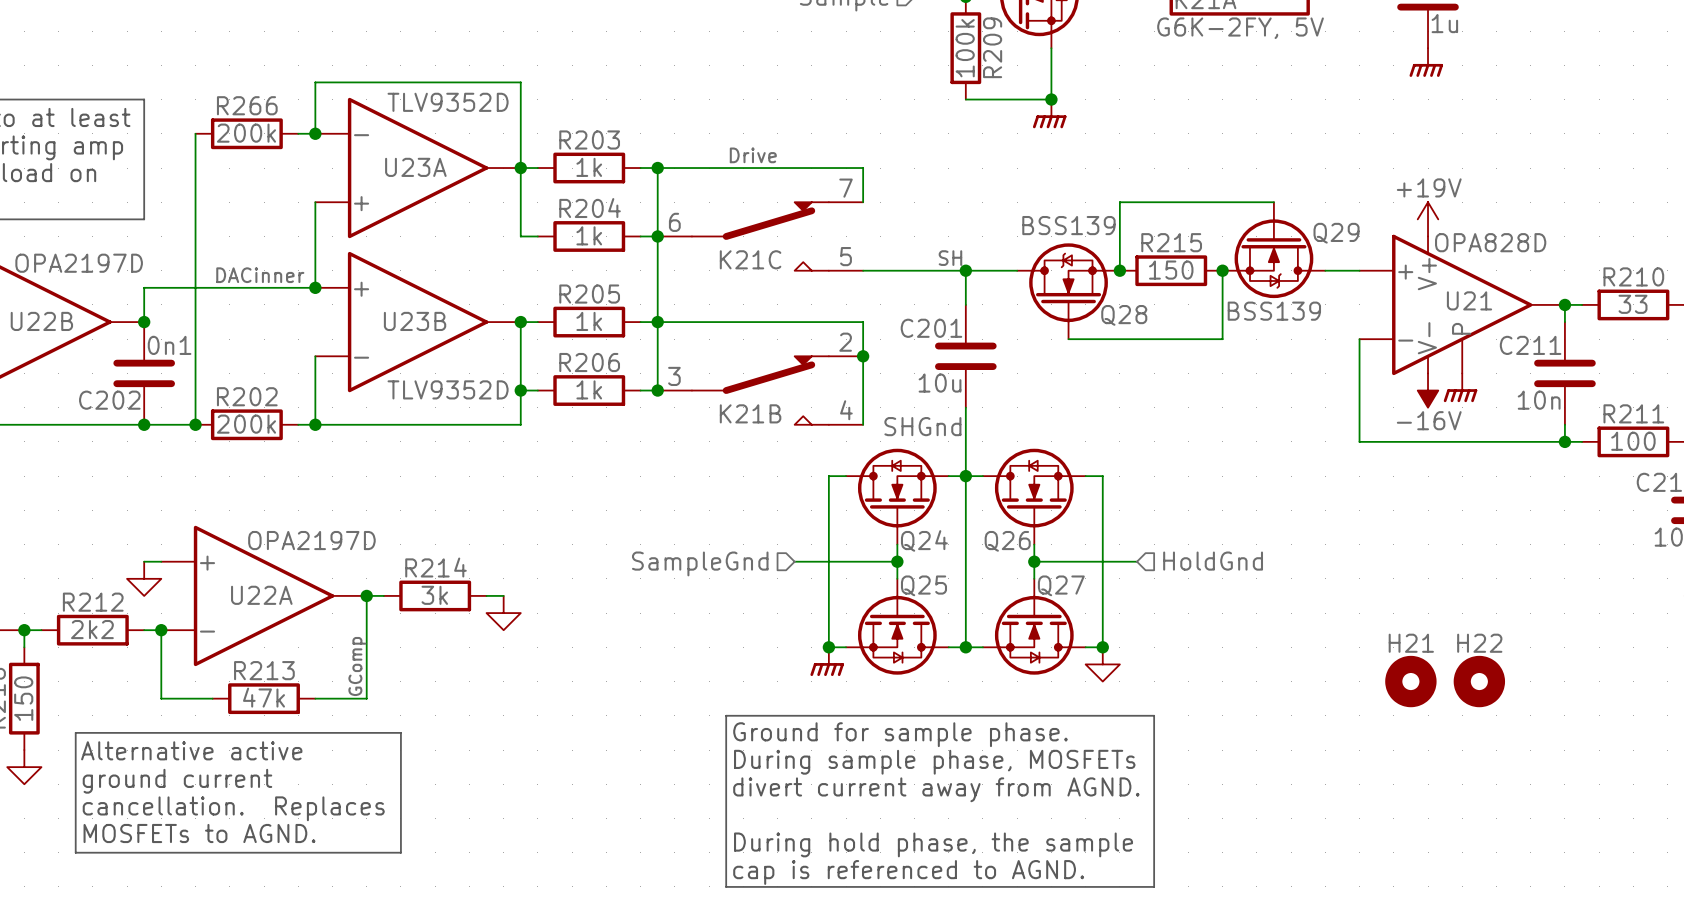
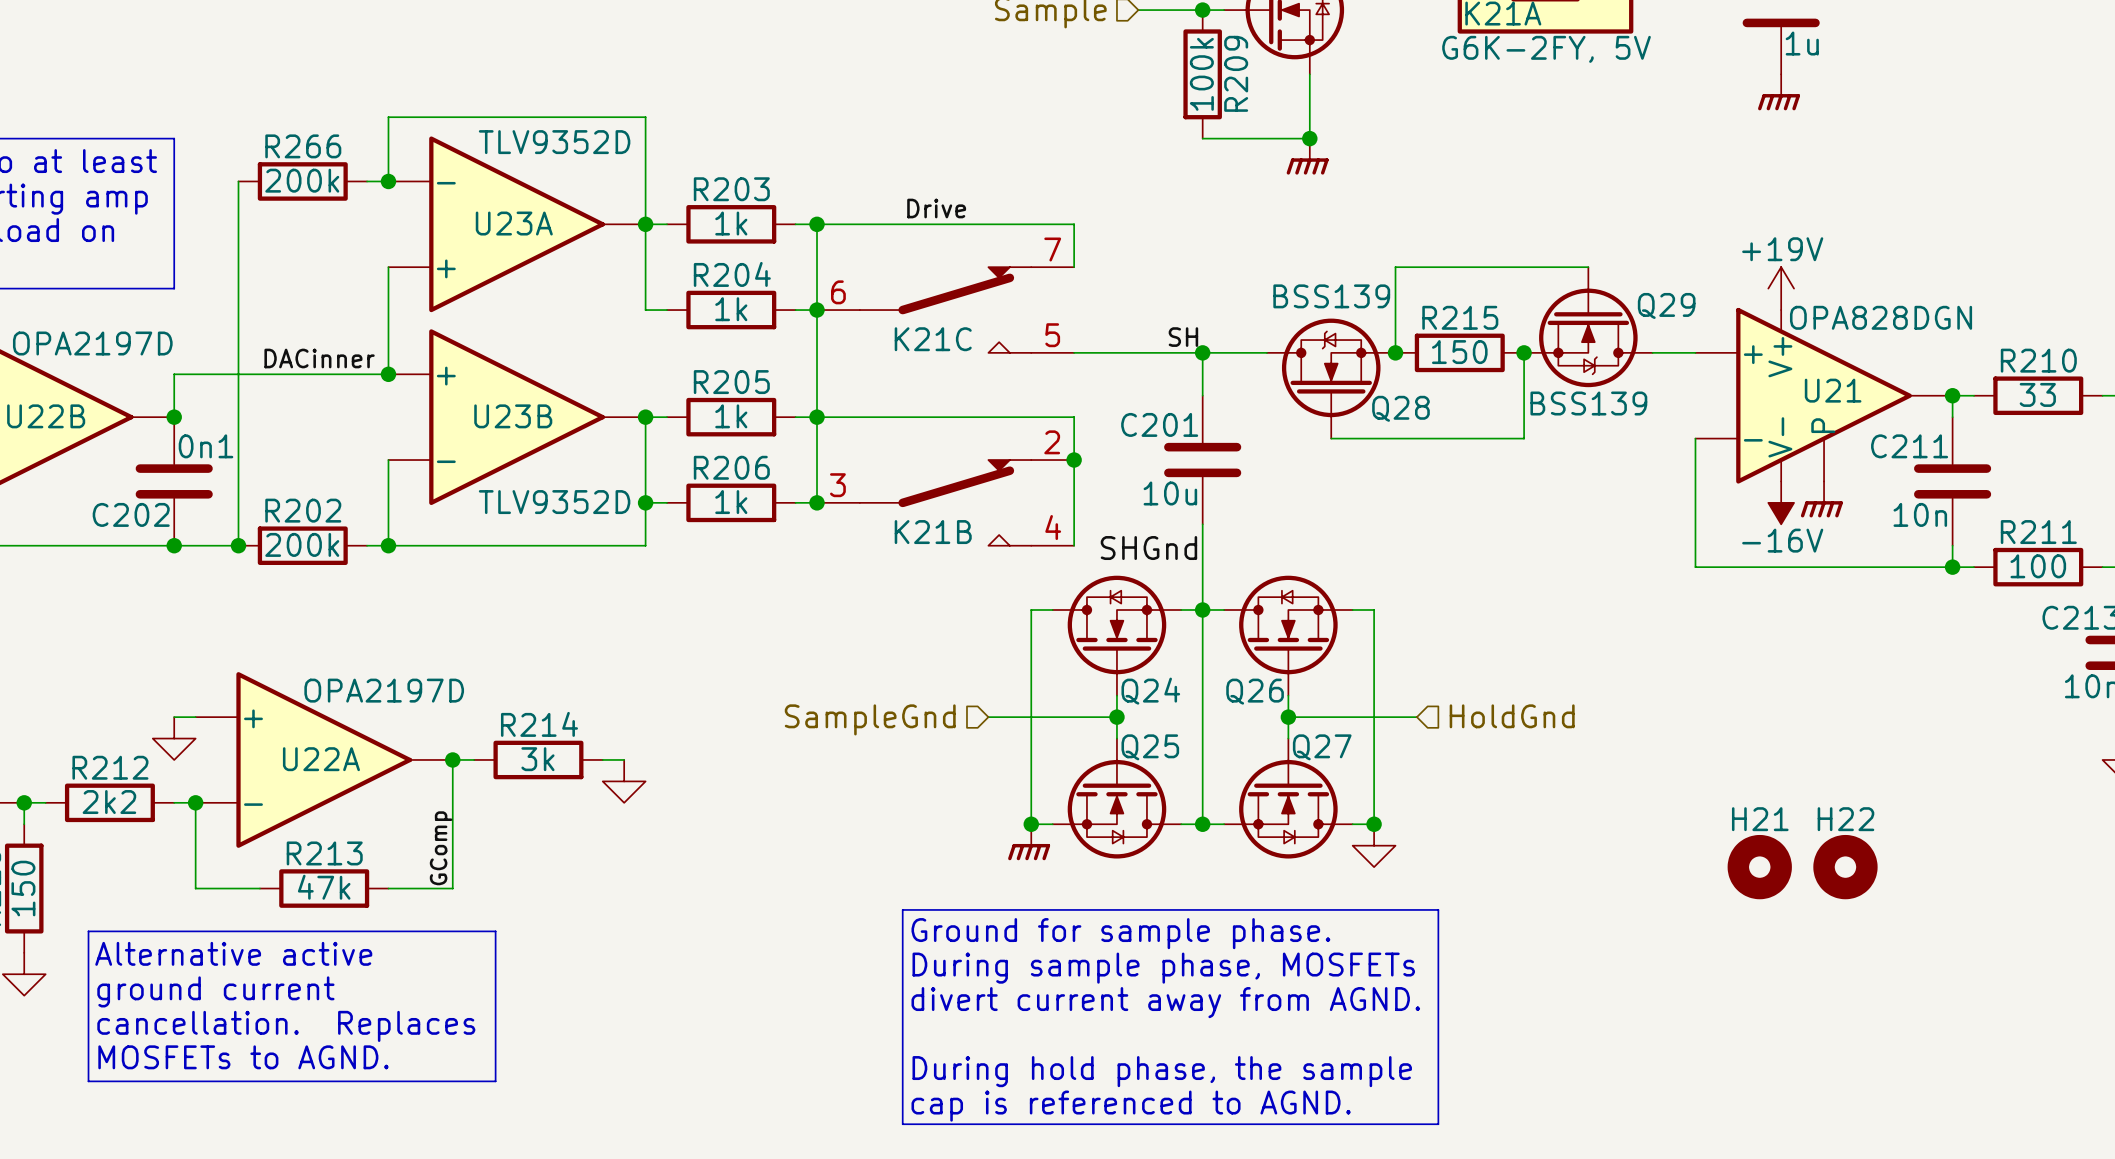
U21 value: OPA828D (1490, 242) -> OPA828DGN (1881, 317)

